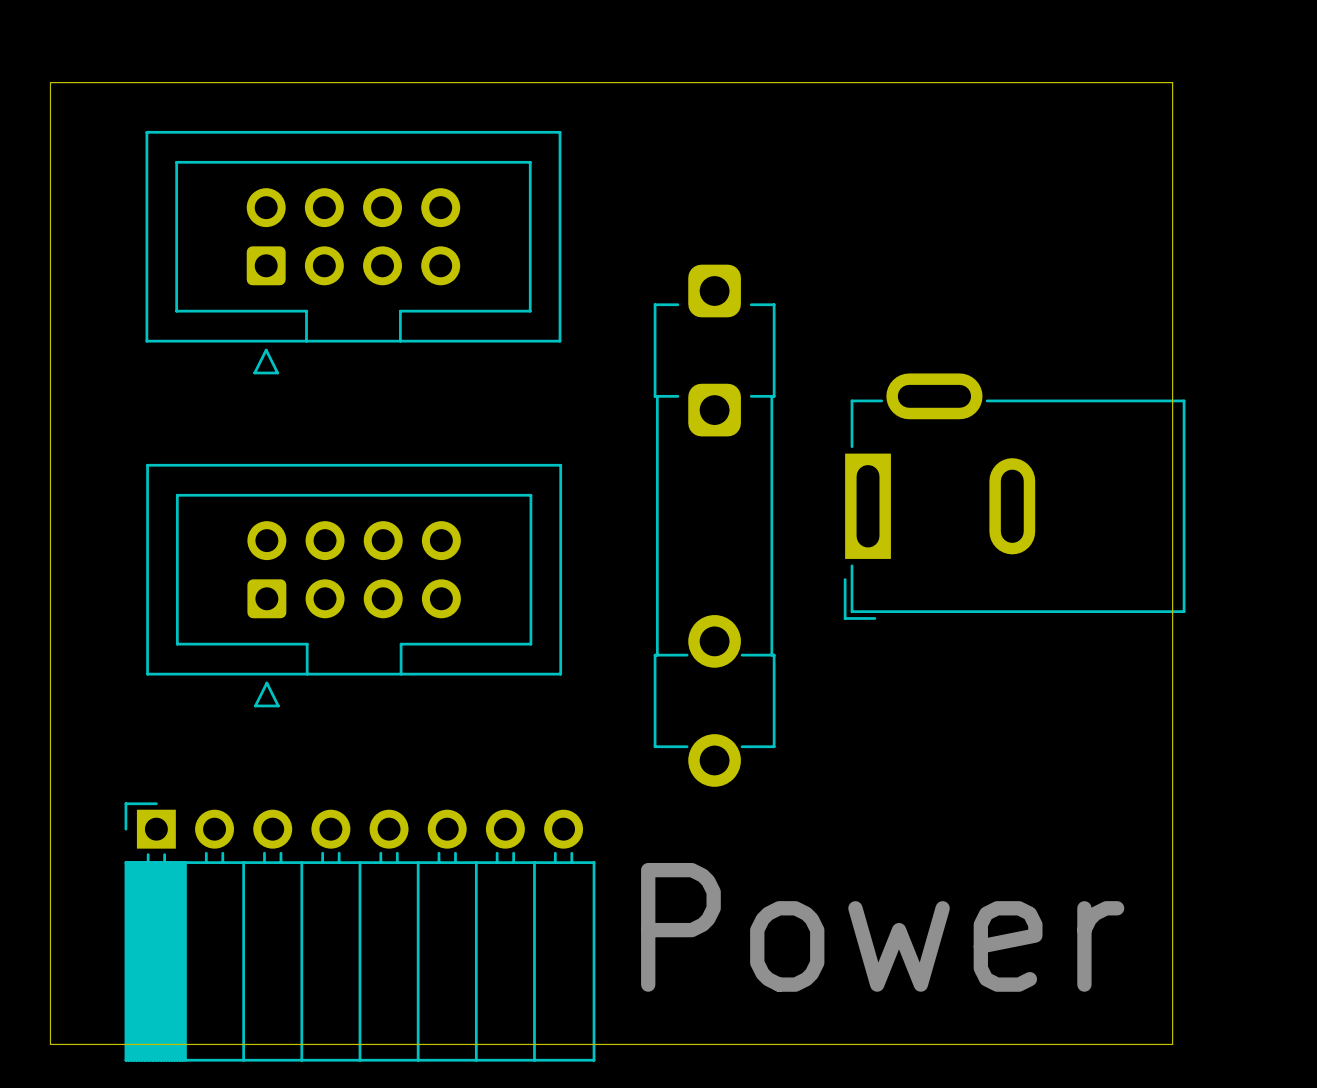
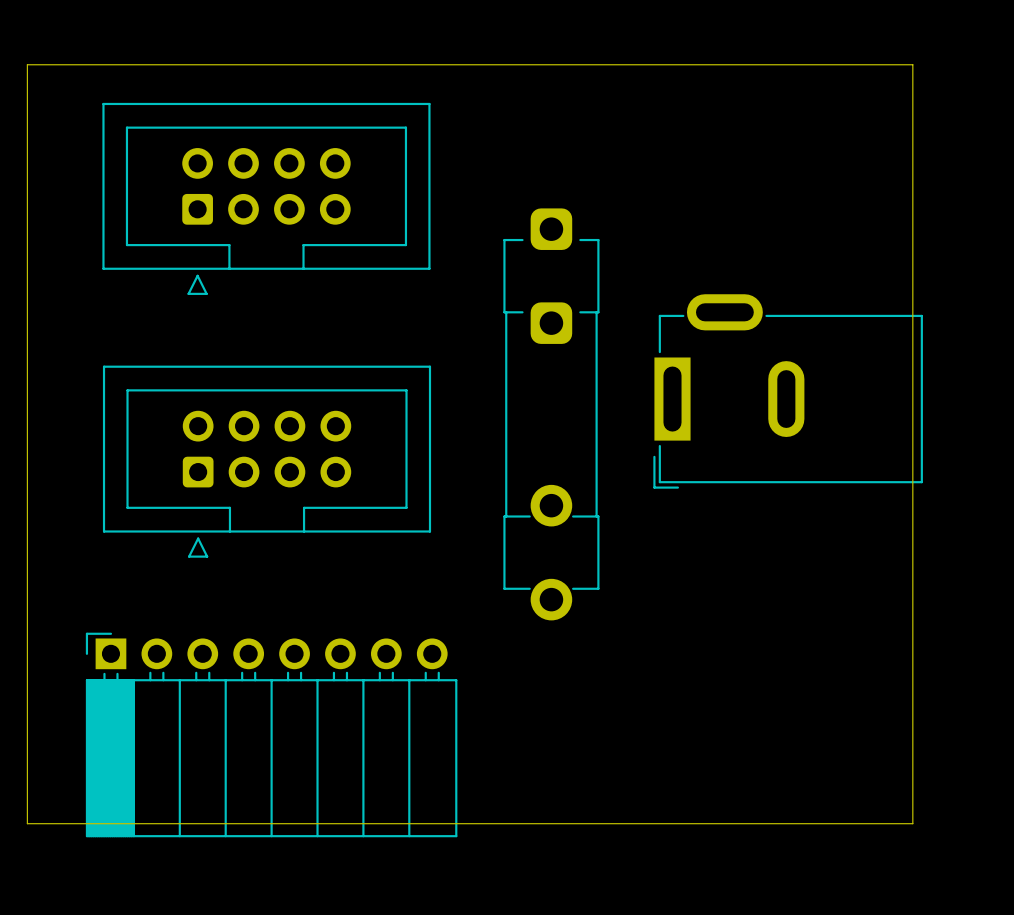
text: Power (882, 927) -> none

